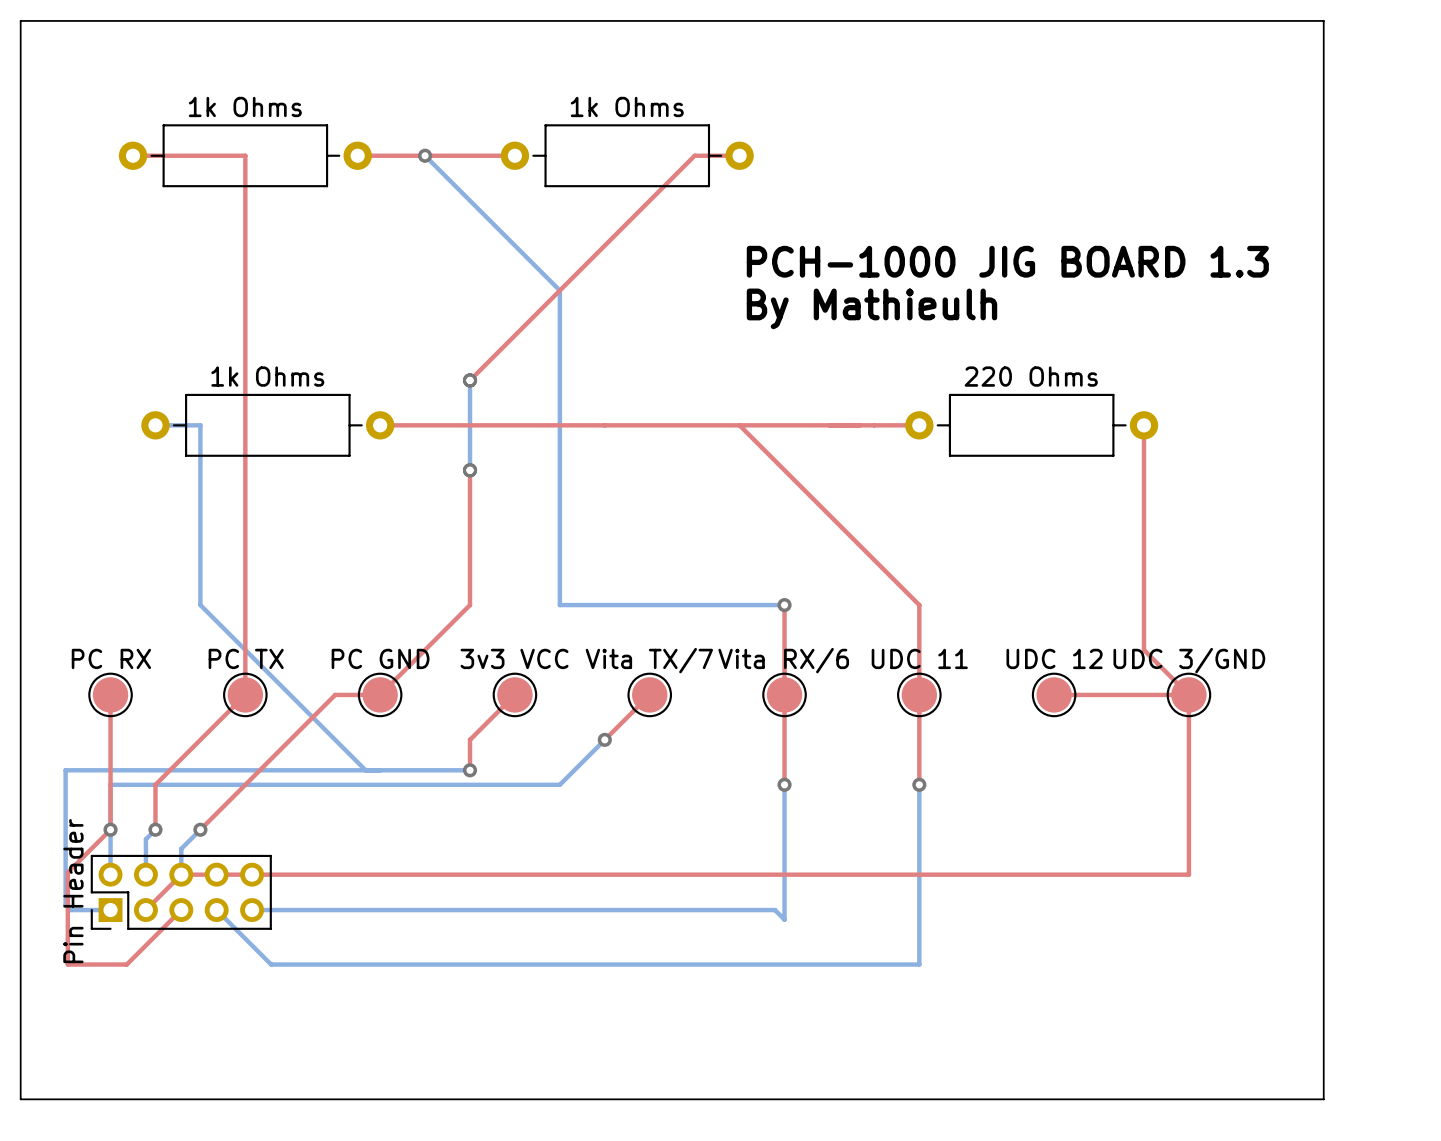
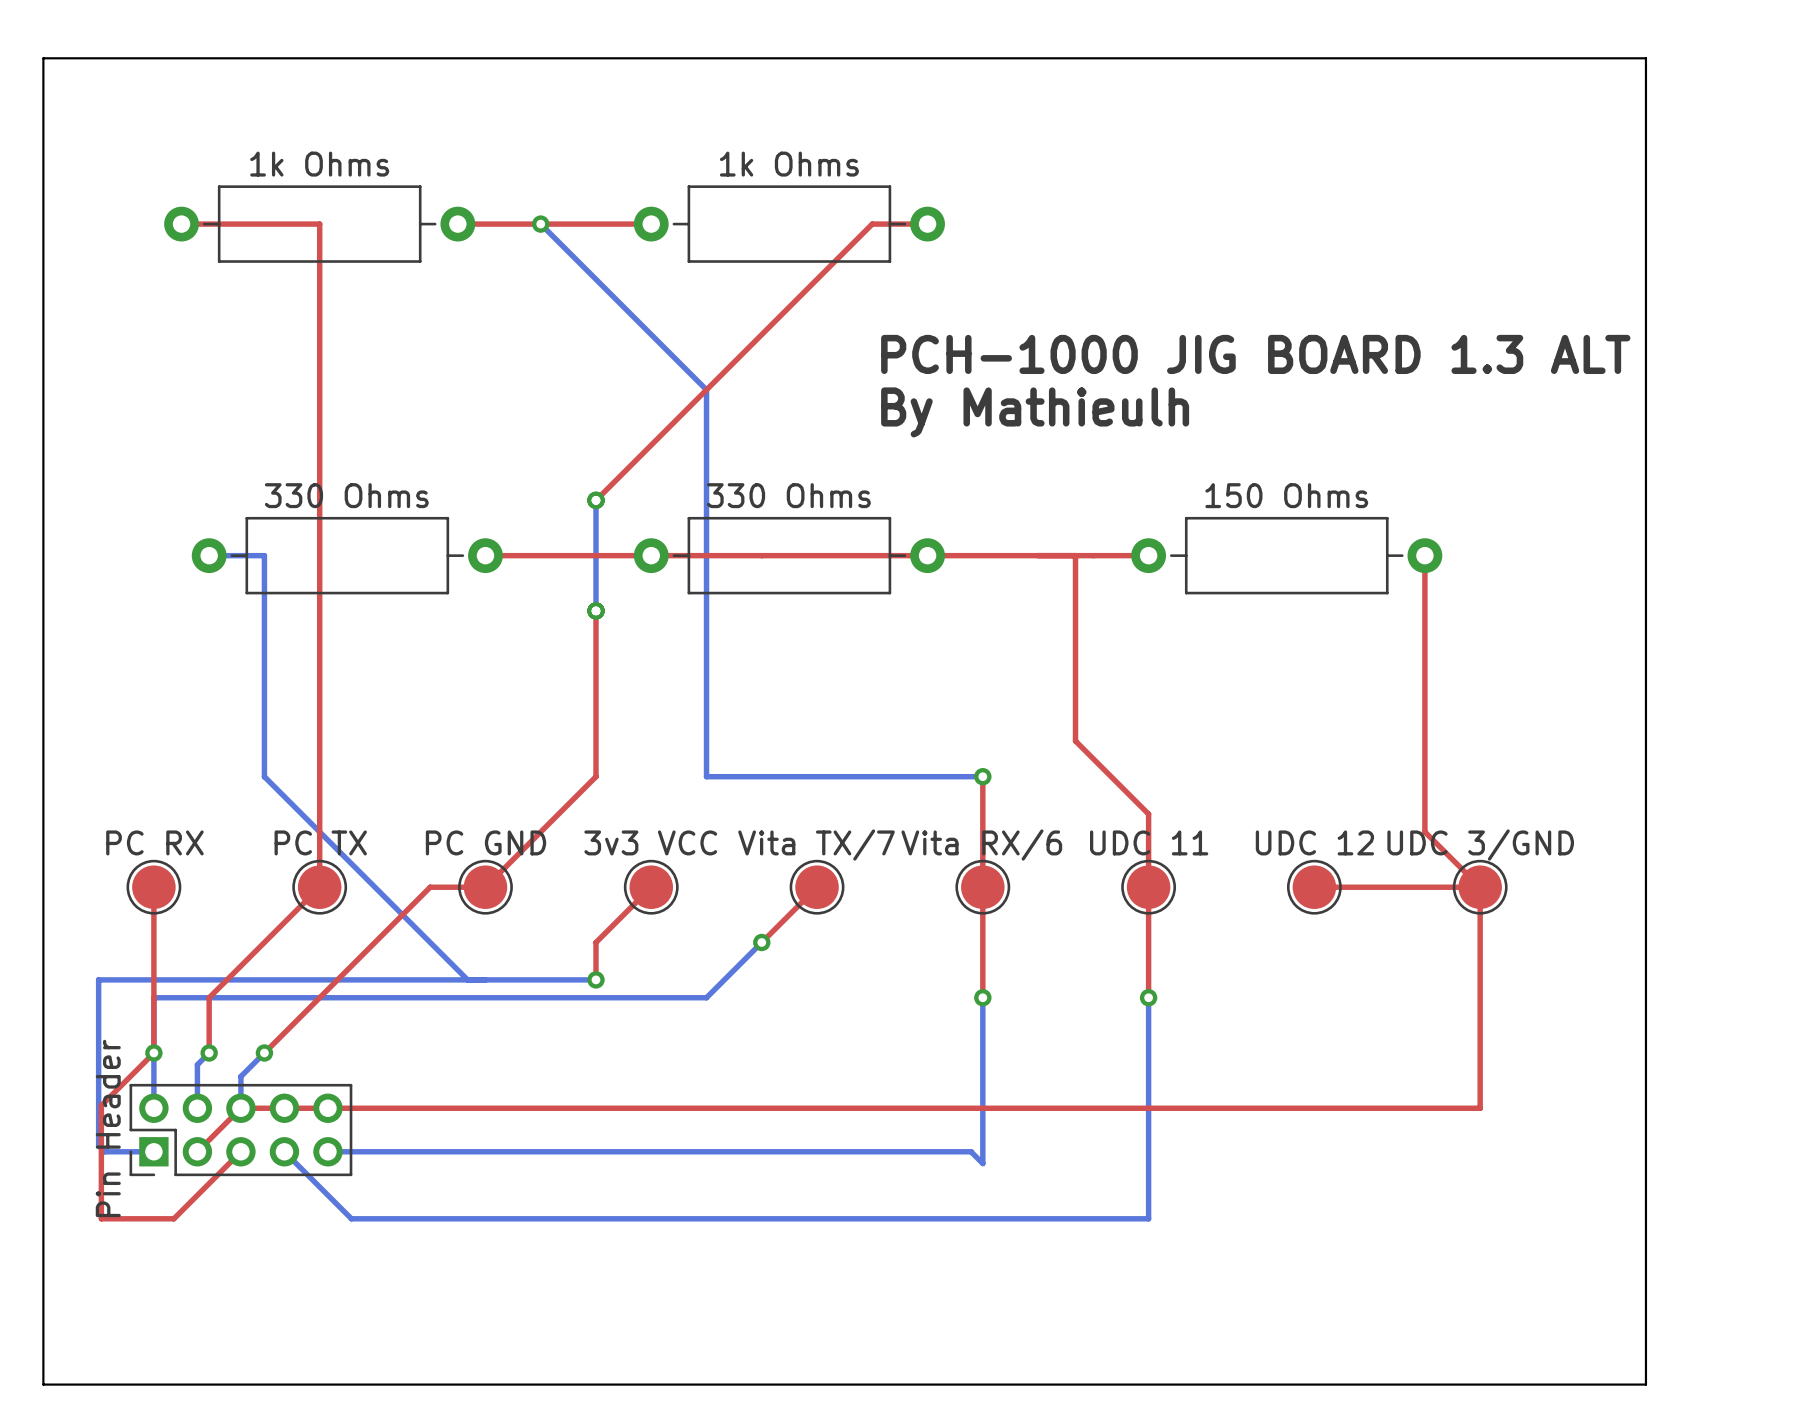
text: PCH-1000 JIG BOARD 1.3 (1007, 261) -> PCH-1000 JIG BOARD 1.3 ALT (1255, 354)
text position: By Mathieulh (871, 308) -> By Mathieulh (1035, 412)
1k Ohms name: 1k Ohms (267, 376) -> 330 Ohms (346, 495)
220 Ohms name: 220 Ohms (1031, 376) -> 150 Ohms (1286, 495)
330 Ohms: none -> (789, 555)
top track: (739, 425) (919, 605) (919, 635) -> (1075, 555) (1075, 741) (1148, 814)

